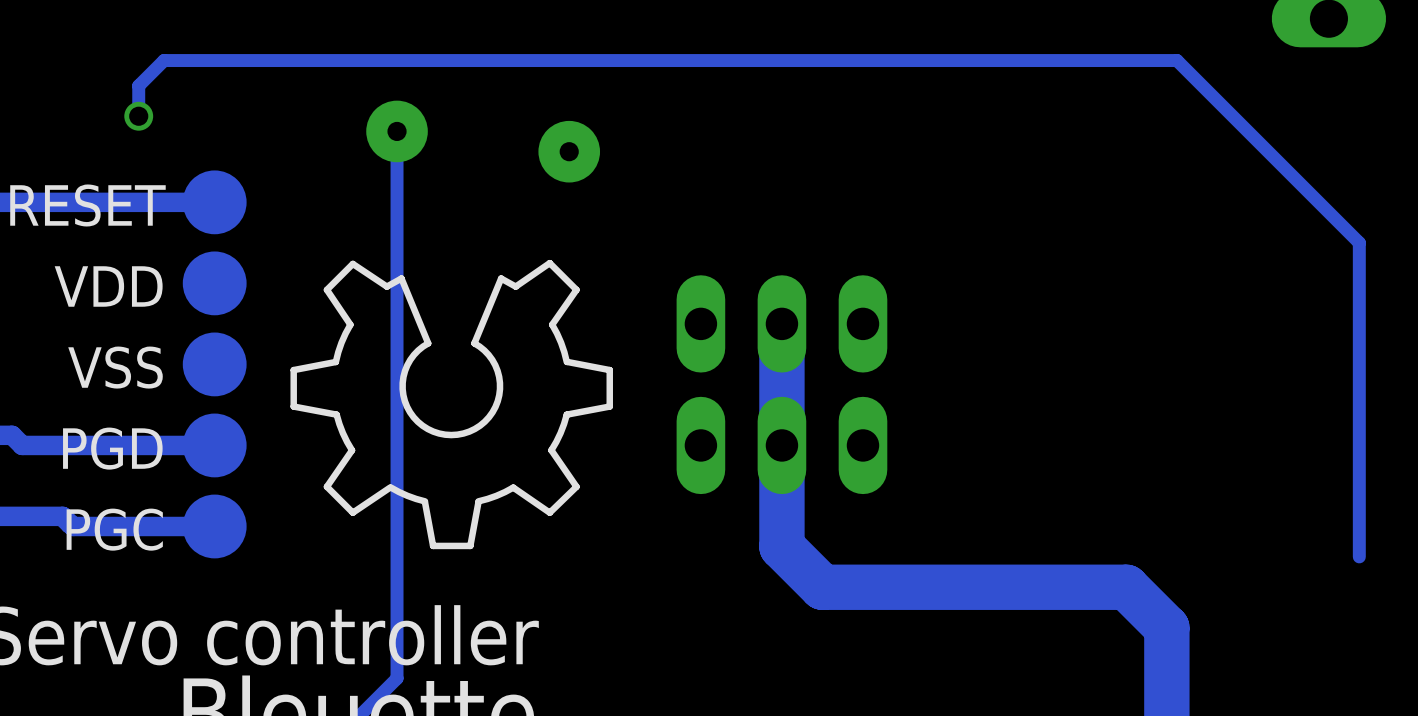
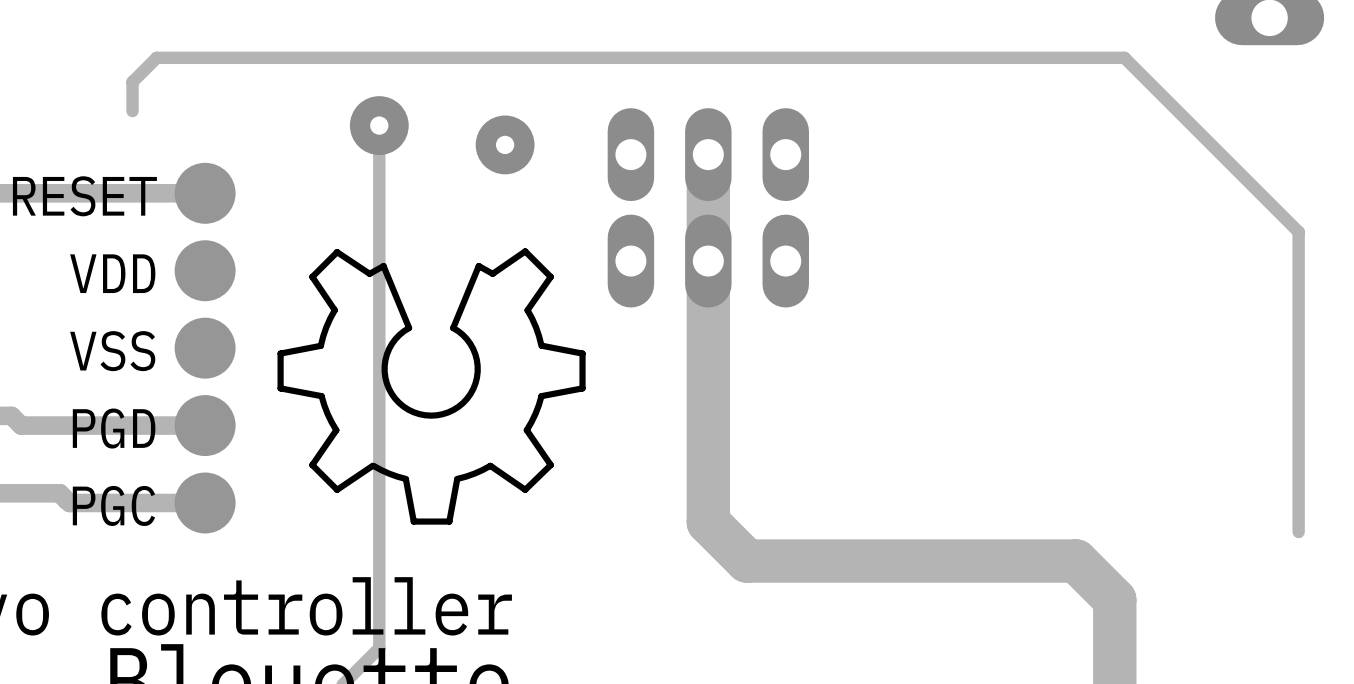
via: (138, 116) -> none
via position: (569, 151) -> (505, 144)
part: none -> (708, 154)
track: (781, 323) (781, 546) (822, 587) -> (708, 154) (708, 522) (747, 561) (785, 561)
part position: (781, 323) -> (708, 261)
part: (781, 445) -> none

